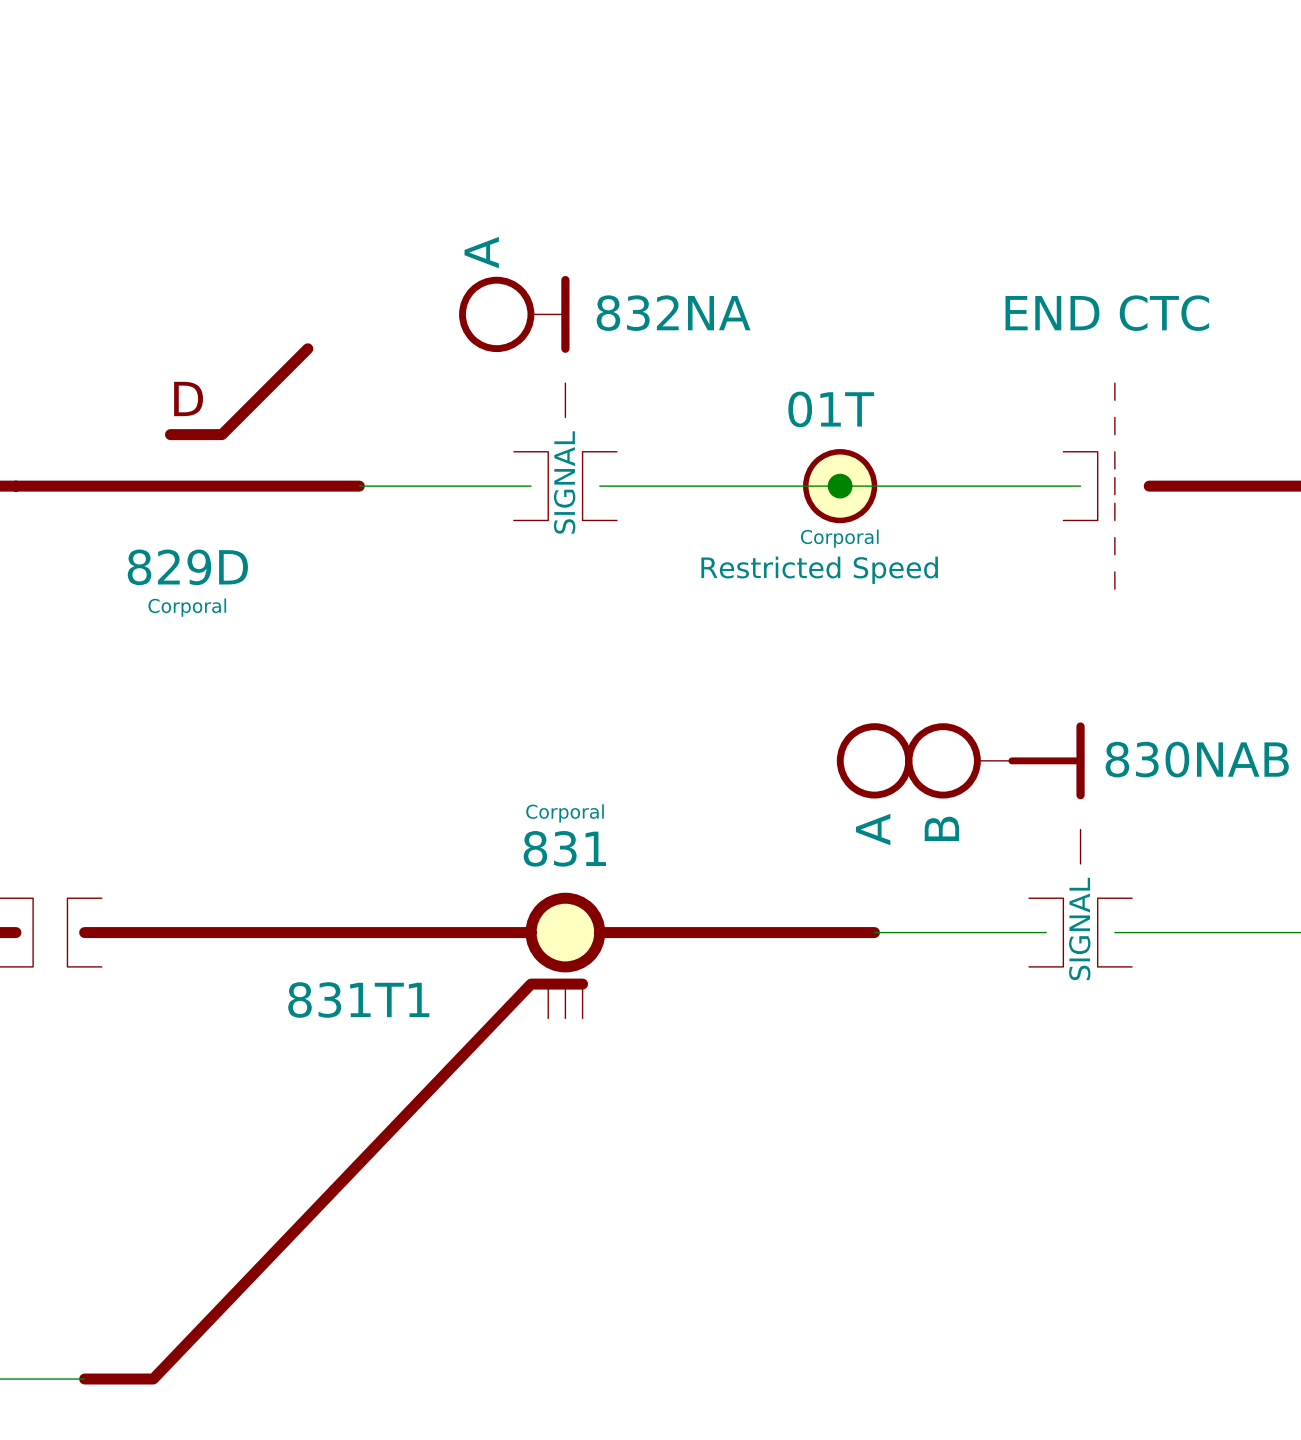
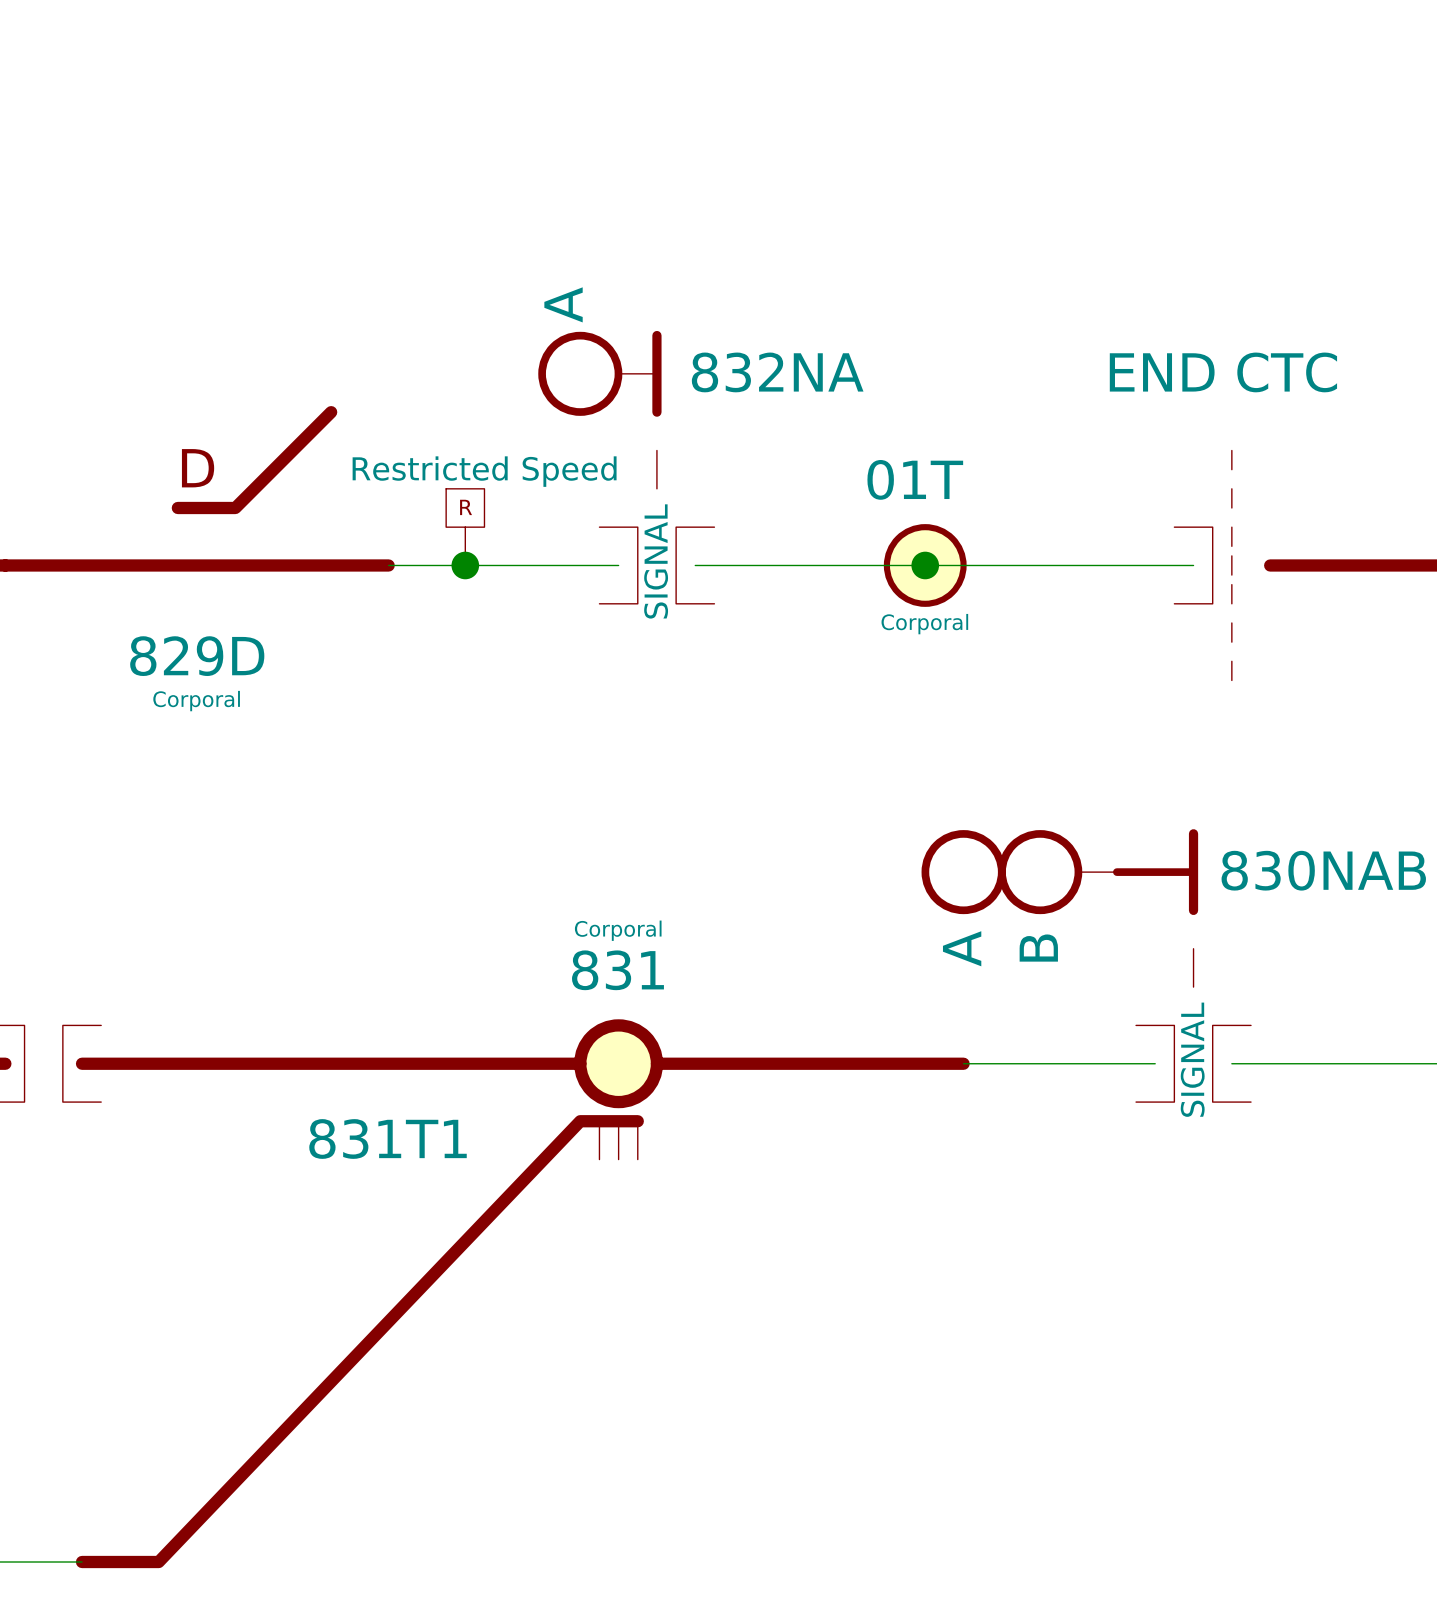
part position: (496, 314) -> (580, 373)
part position: (550, 314) -> (640, 373)
part: none -> Restricted Speed (465, 527)
part position: (565, 451) -> (656, 527)
junction: none -> (465, 565)
wire: (599, 486) (634, 486) -> (580, 565) (618, 565)
part: Restricted Speed (819, 570) -> none

